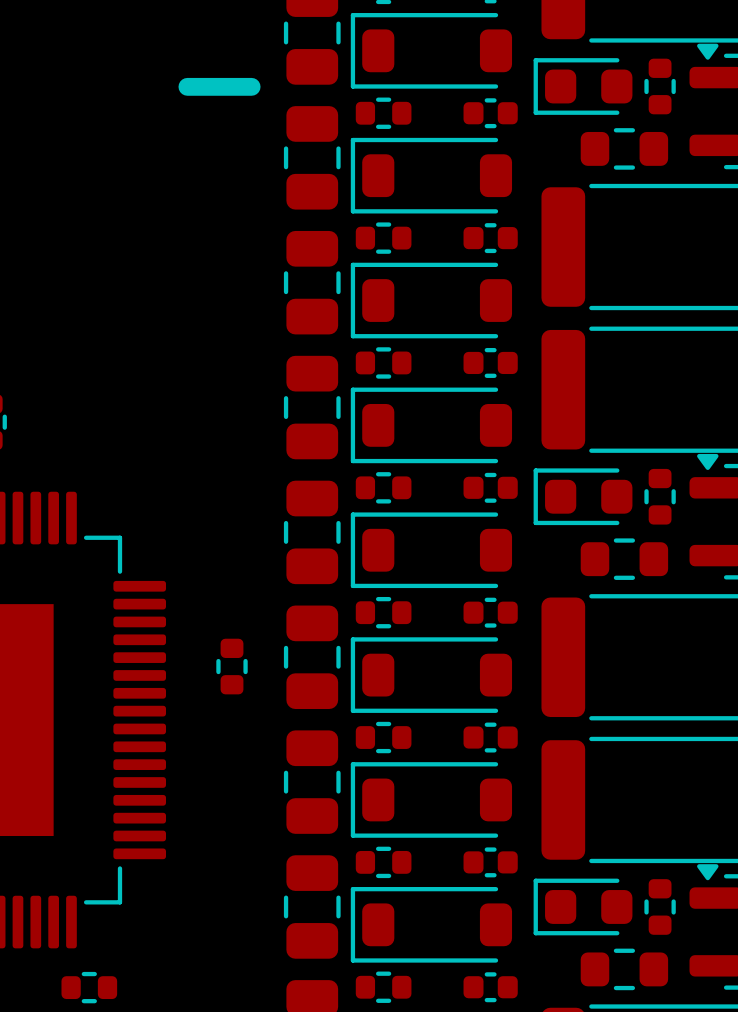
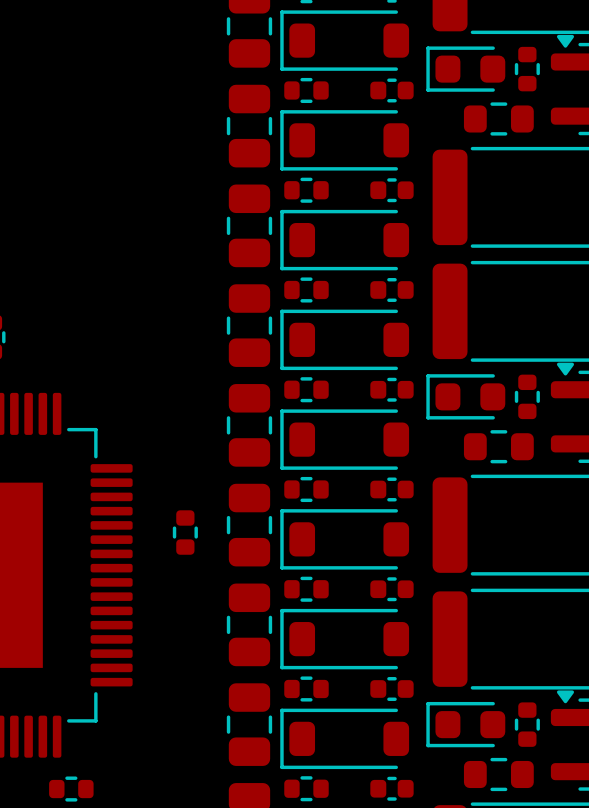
line: (187, 86) (251, 86) -> none

